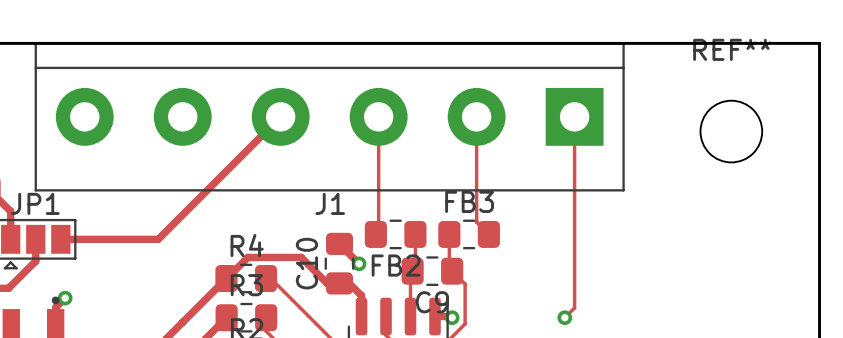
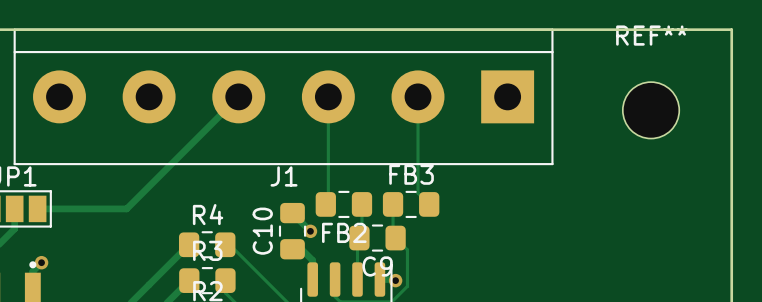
track: (574, 116) (574, 307) (564, 317) -> none
track: (226, 278) (247, 257) (301, 257) (327, 283) (339, 283) -> none
via: (564, 317) -> none

